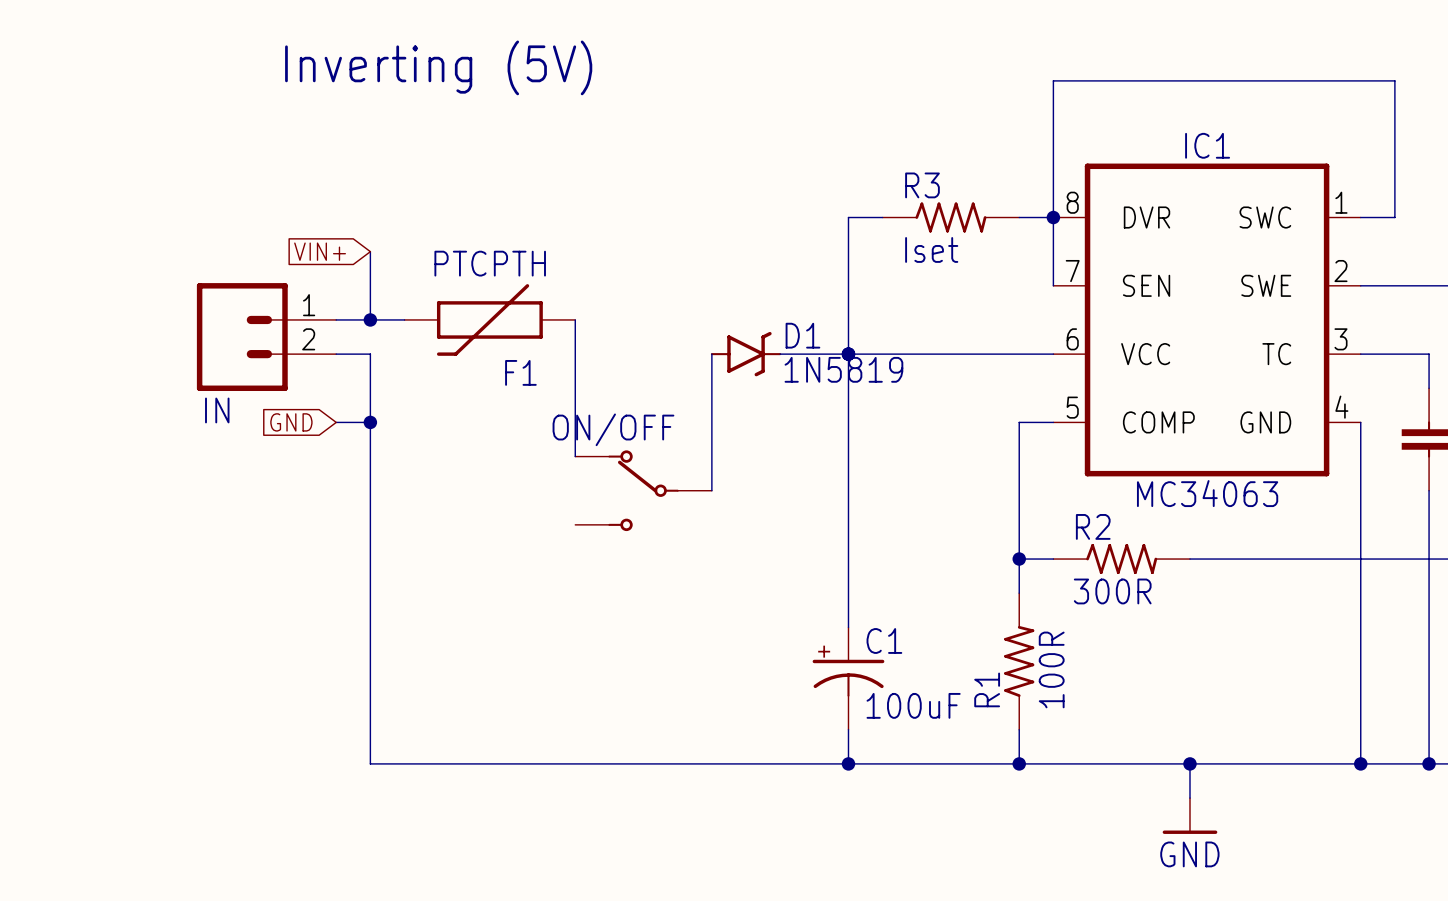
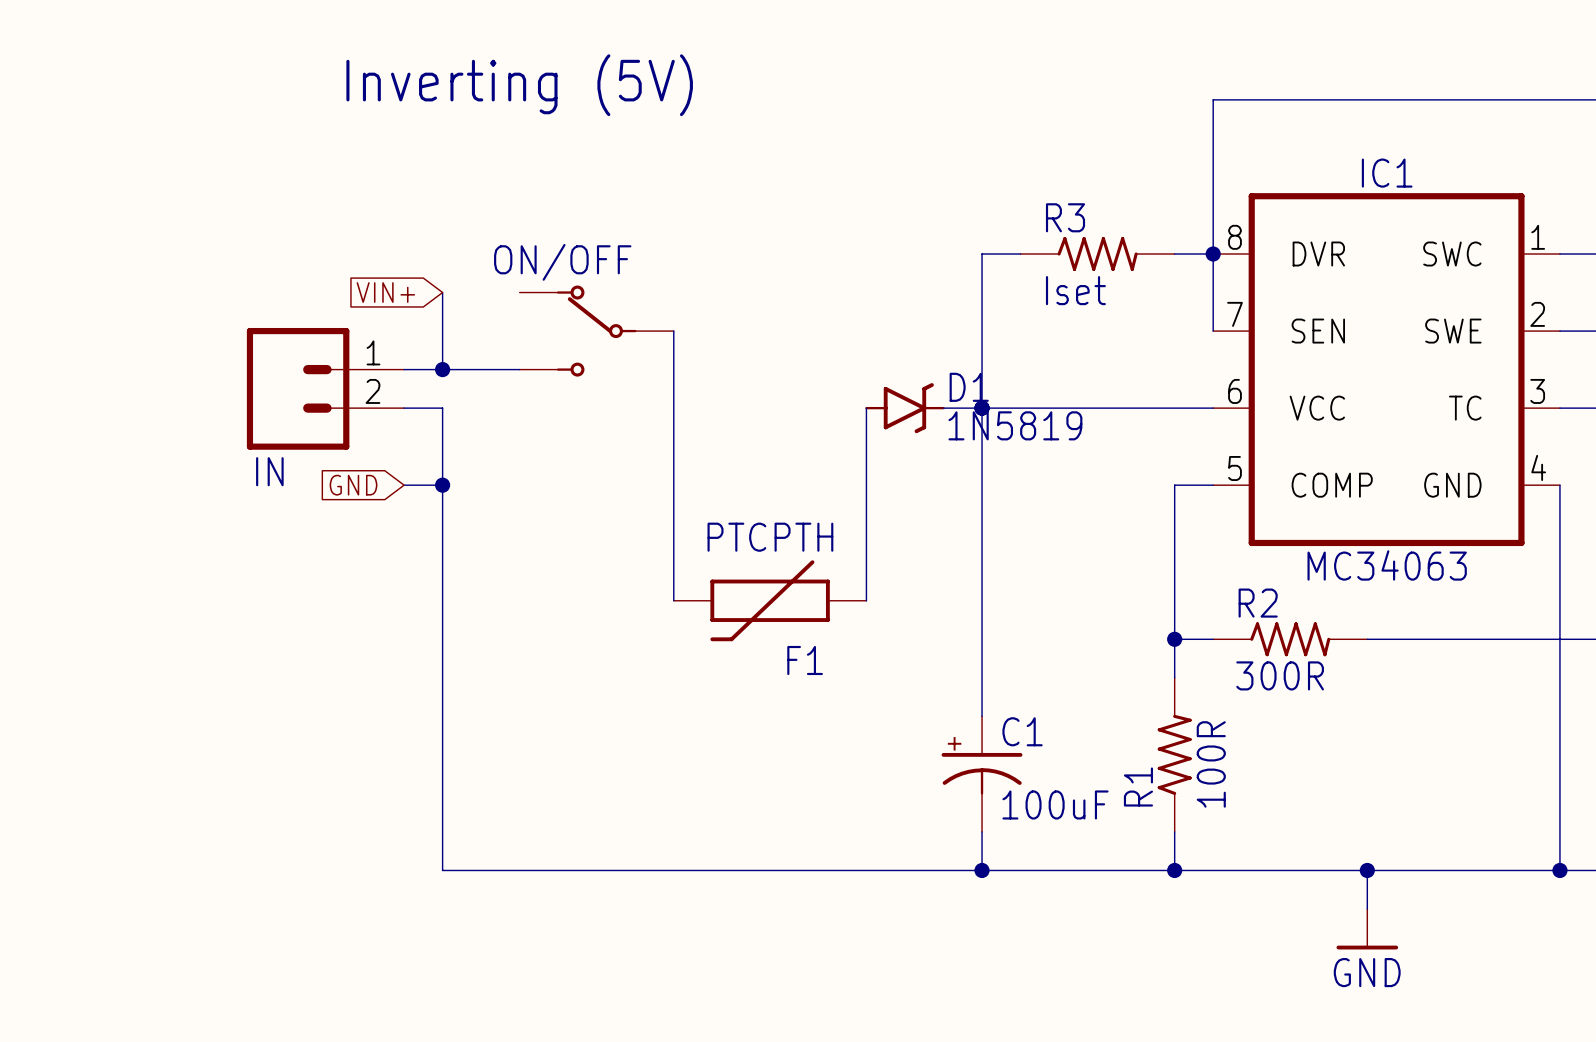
wire: none -> (673, 331) (673, 369)
F1 position: (489, 319) -> (770, 600)
wire: (711, 354) (711, 490) -> none
wire: none -> (866, 408) (866, 600)
D1 position: (746, 354) -> (904, 408)
wire: none -> (673, 523) (673, 600)
ON/OFF position: (643, 490) -> (596, 331)

